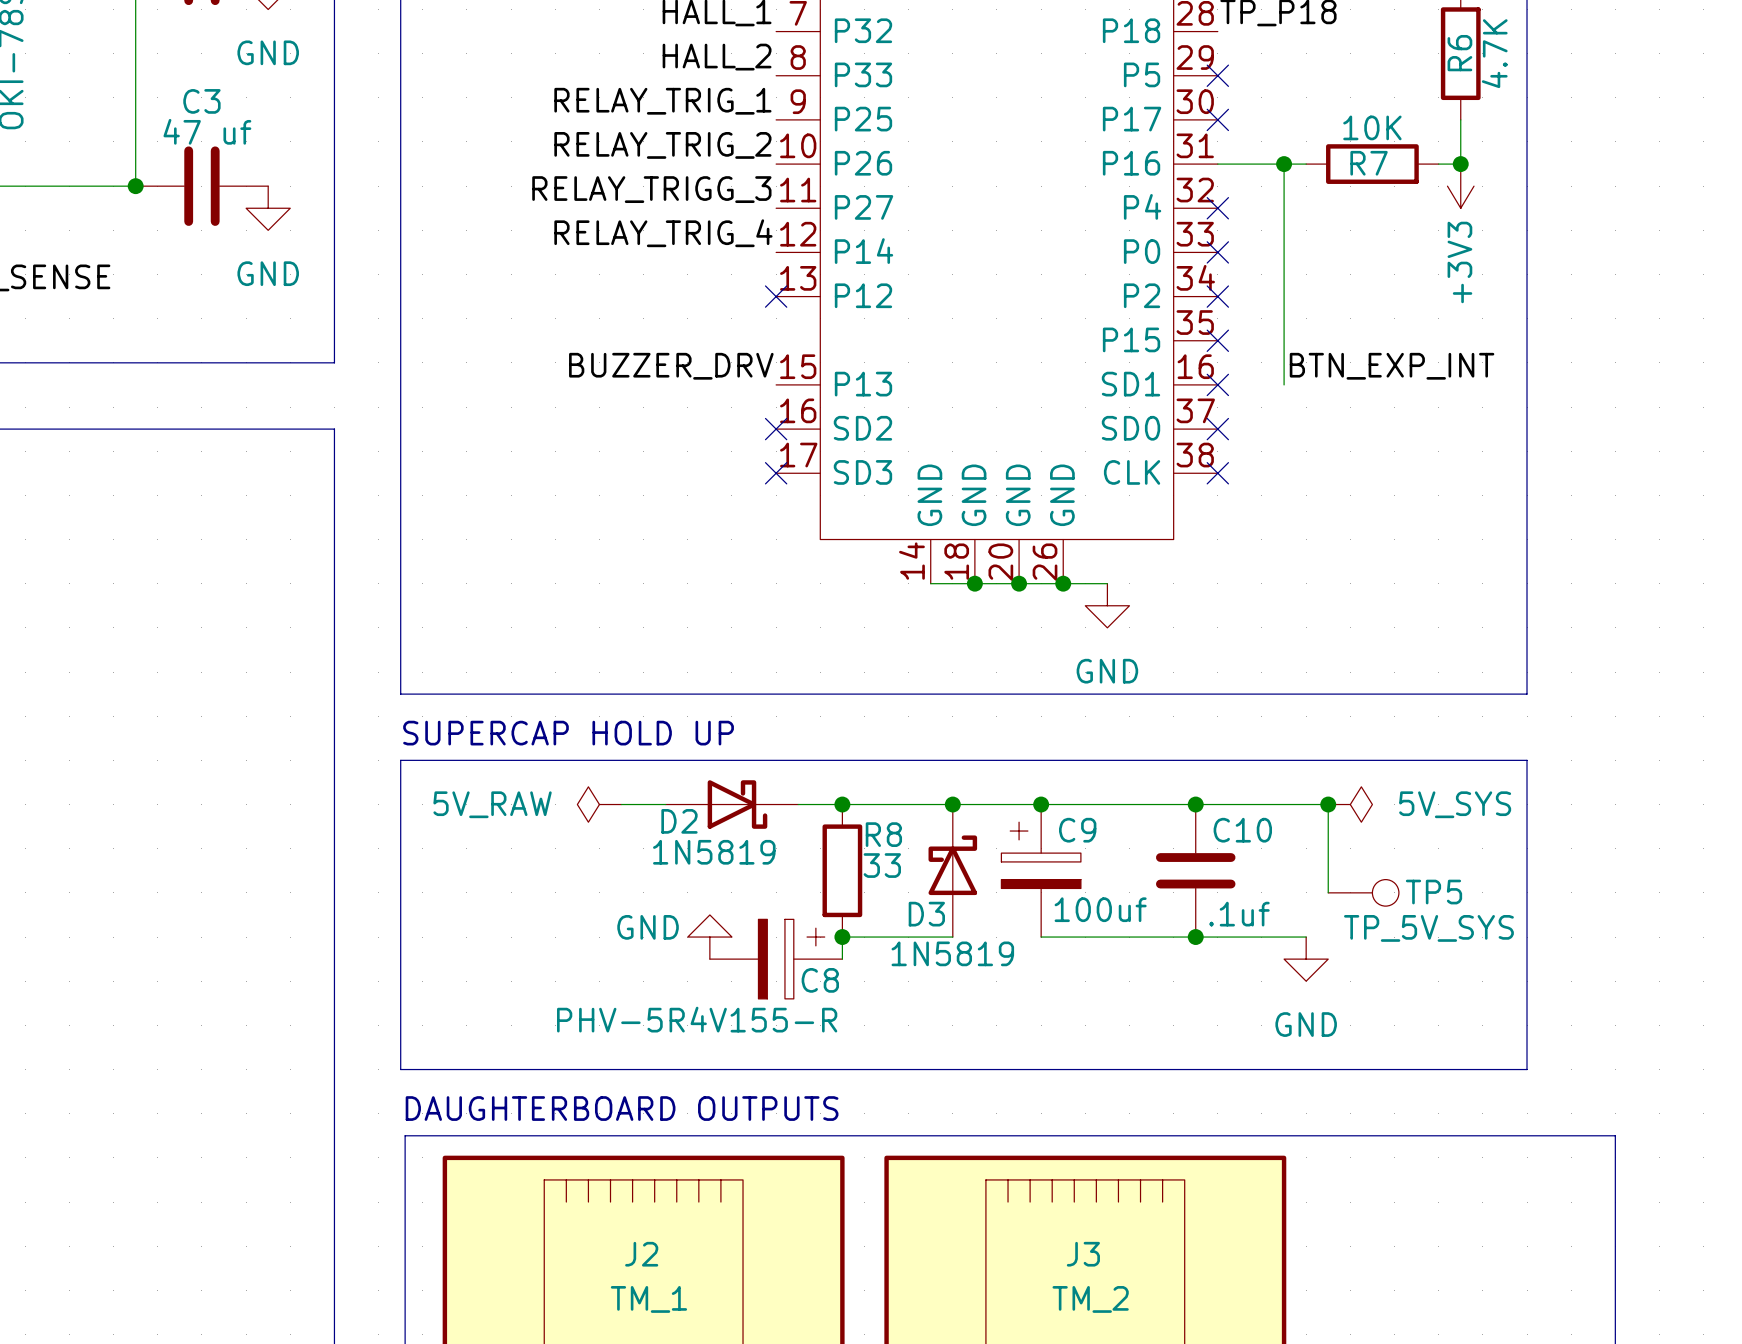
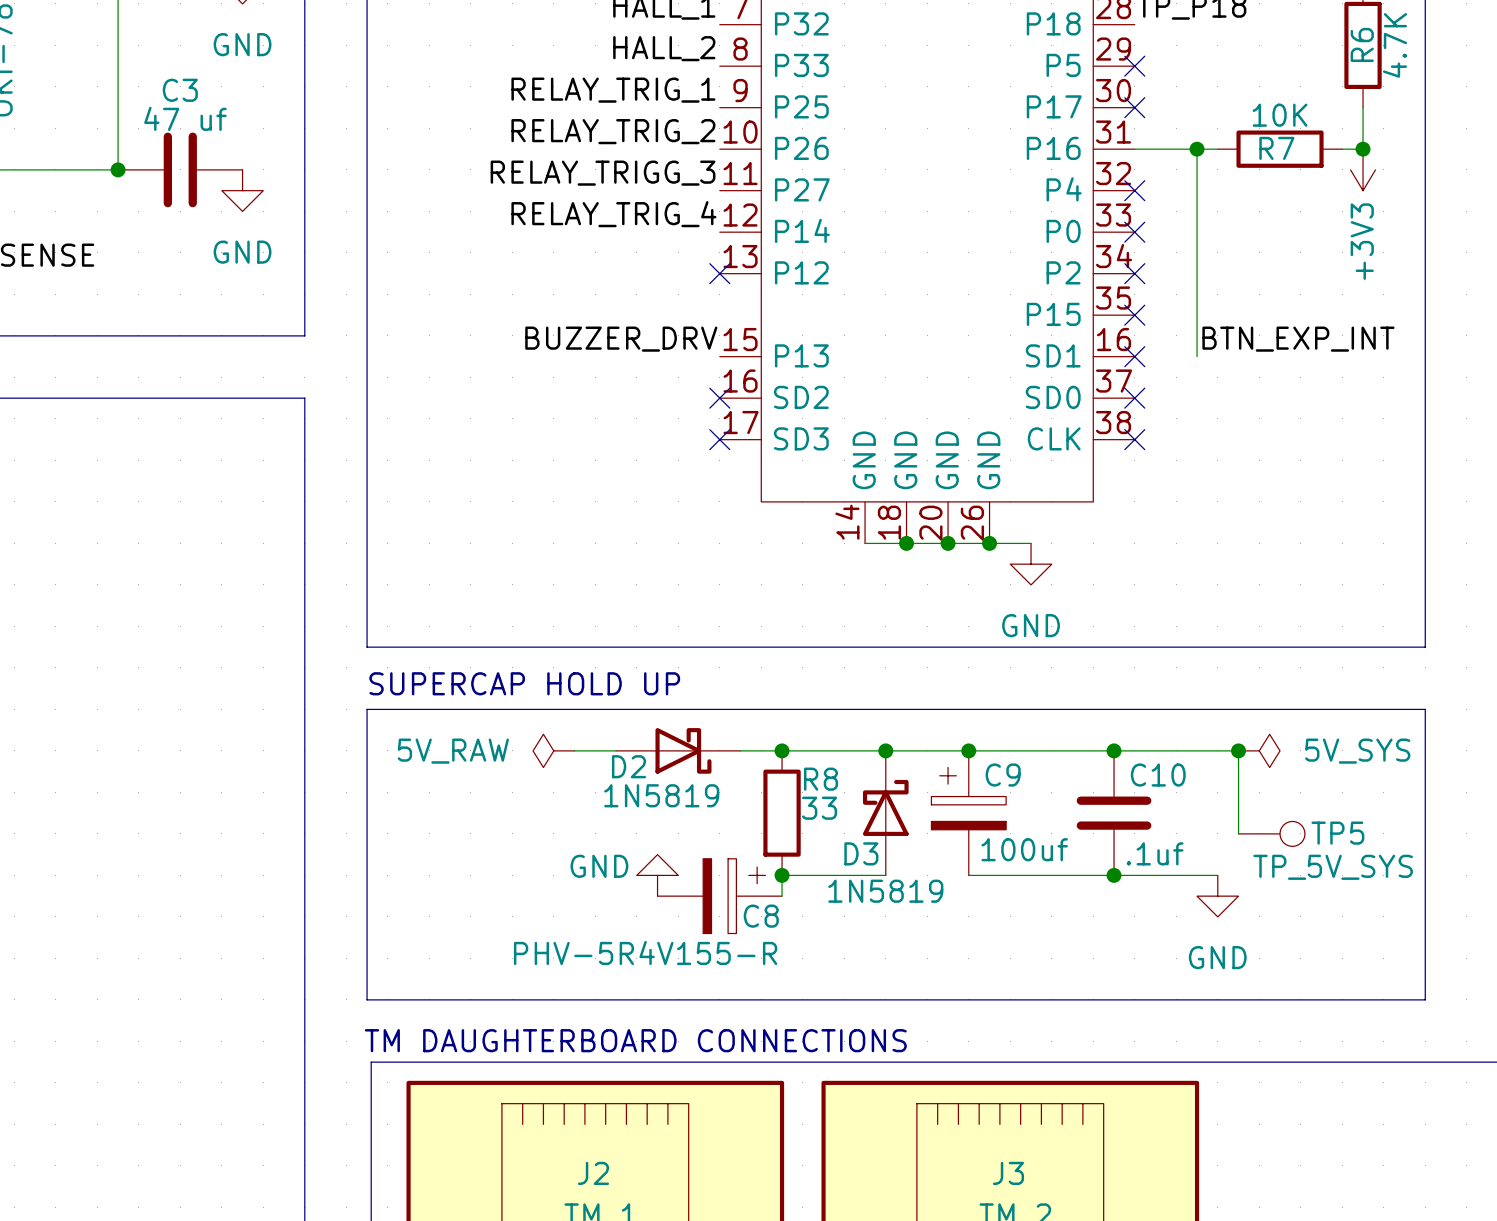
text: DAUGHTERBOARD OUTPUTS (622, 1108) -> TM DAUGHTERBOARD CONNECTIONS (635, 1040)

